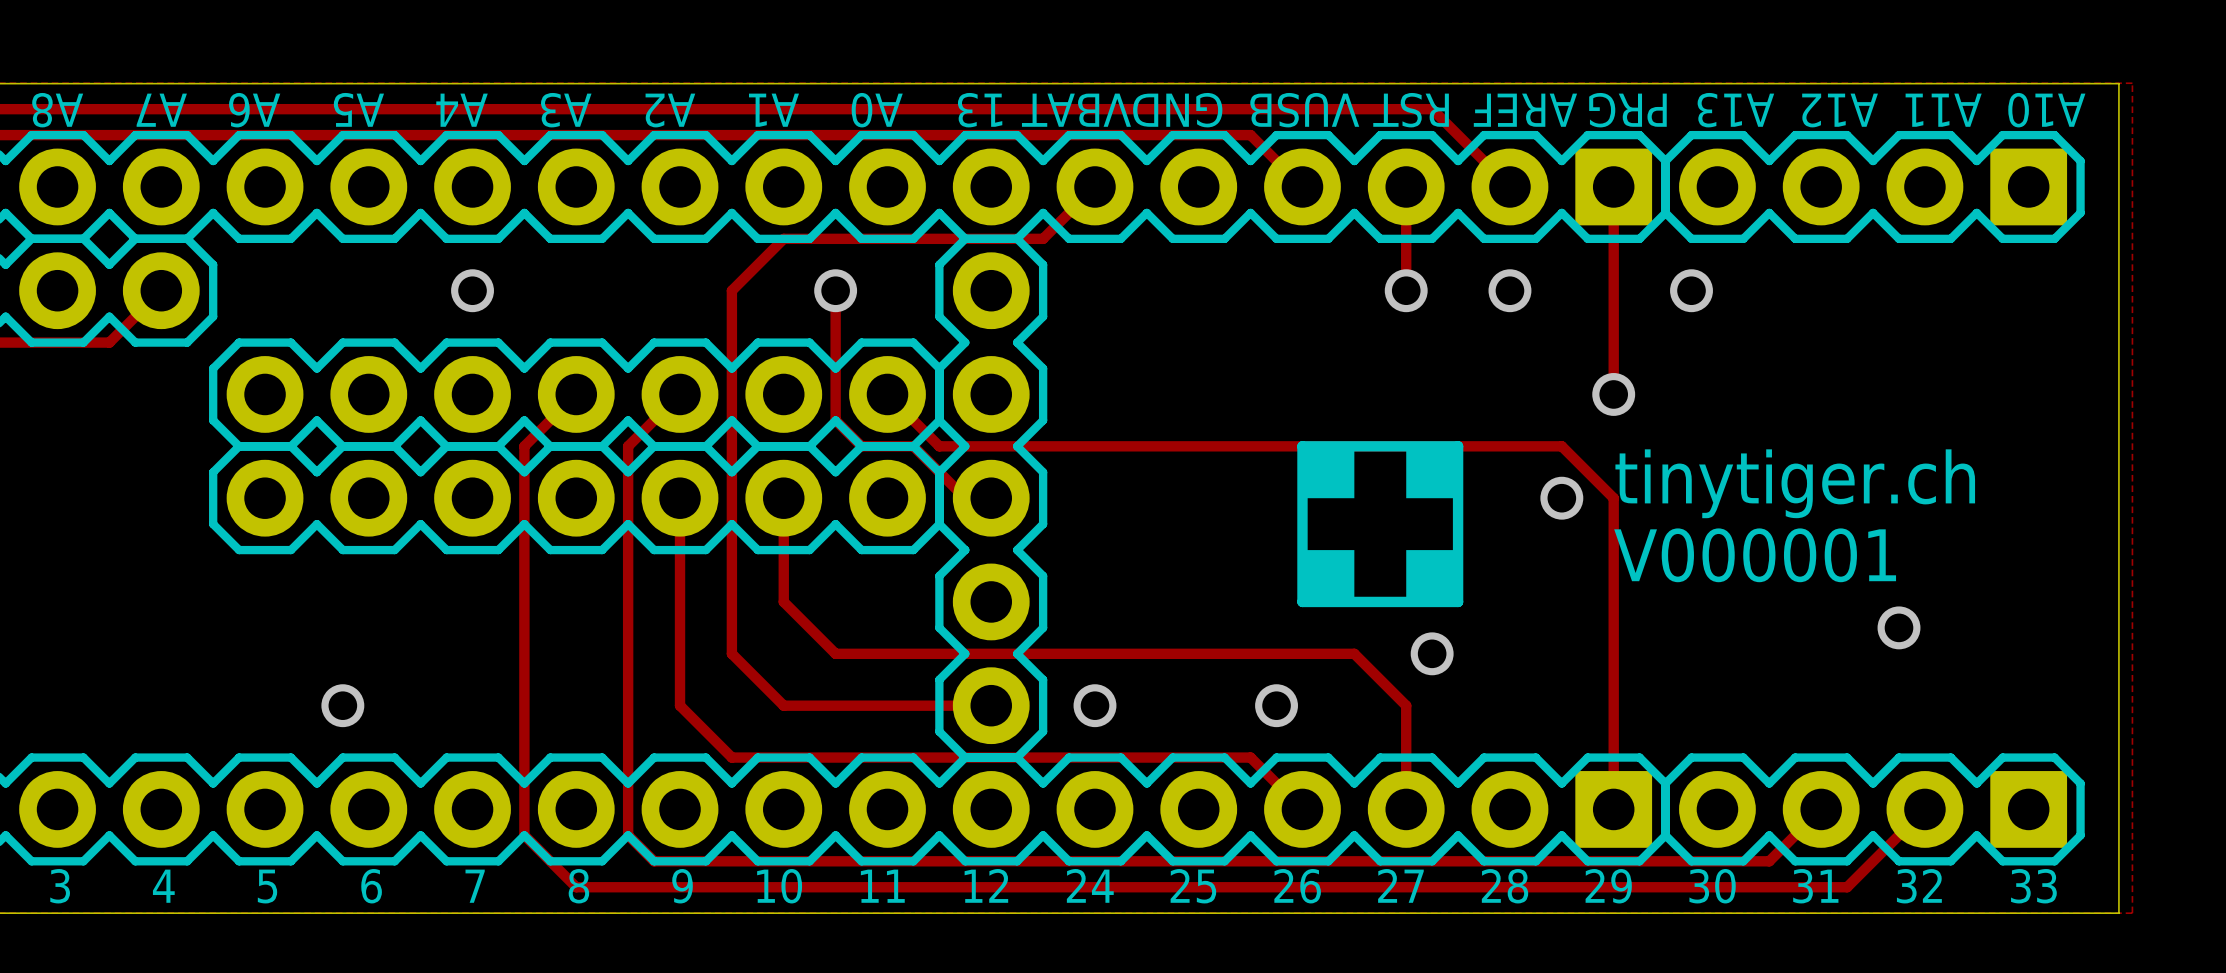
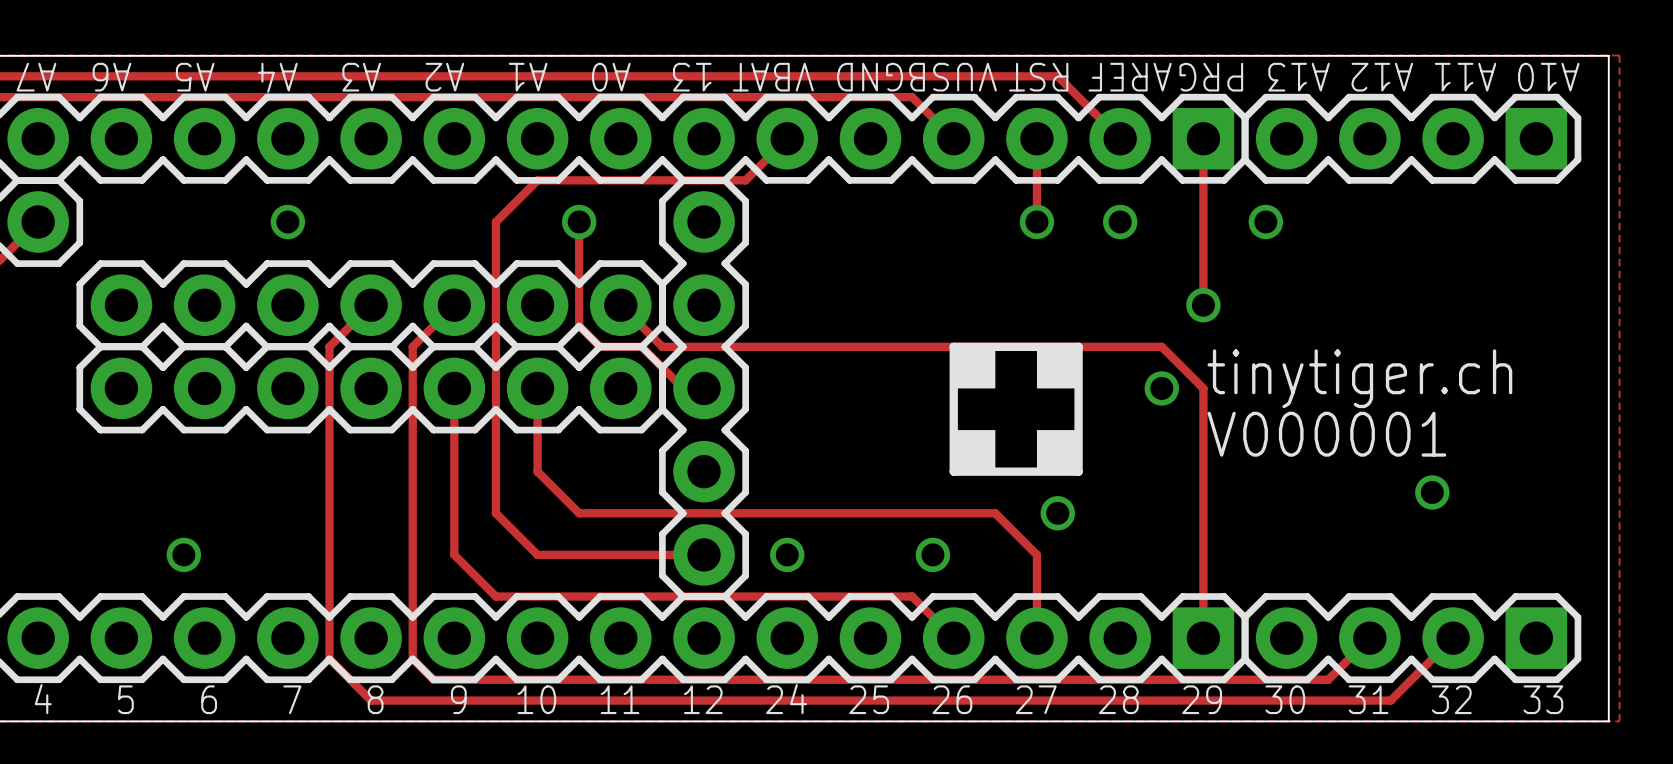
text position: GND (1177, 110) -> GND (870, 77)

